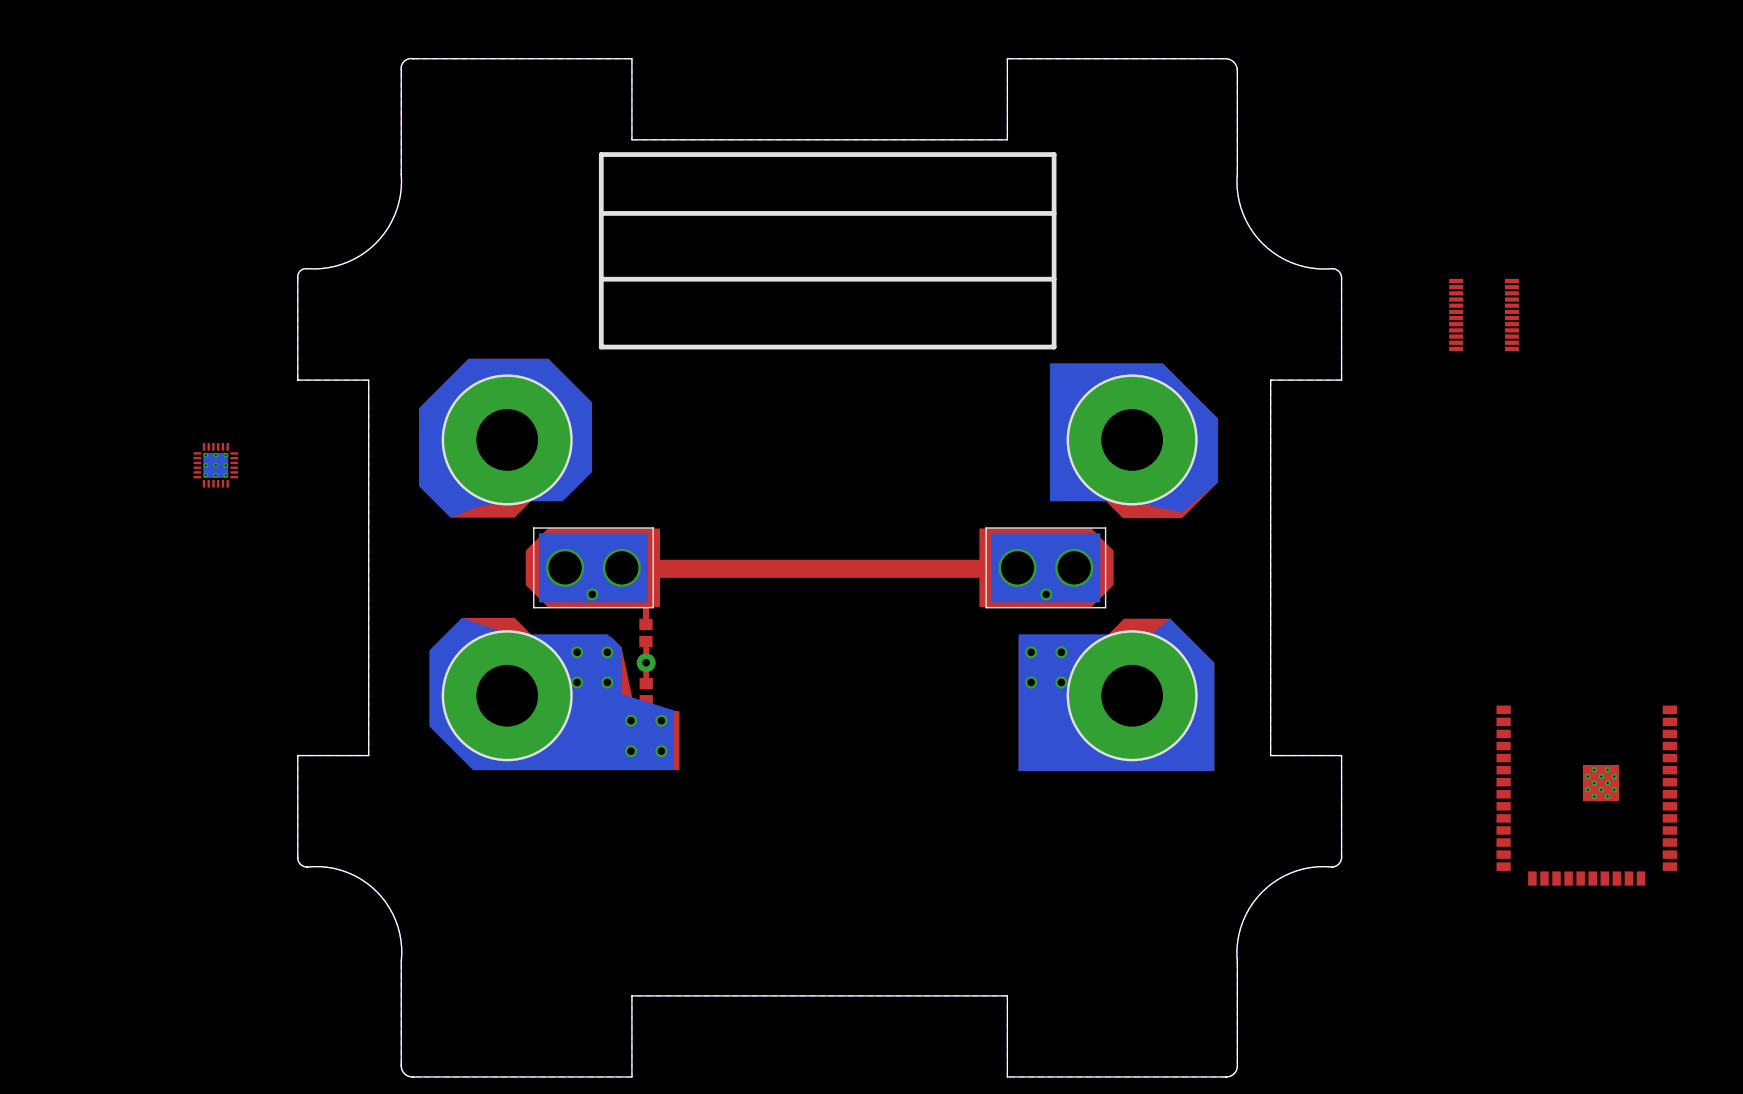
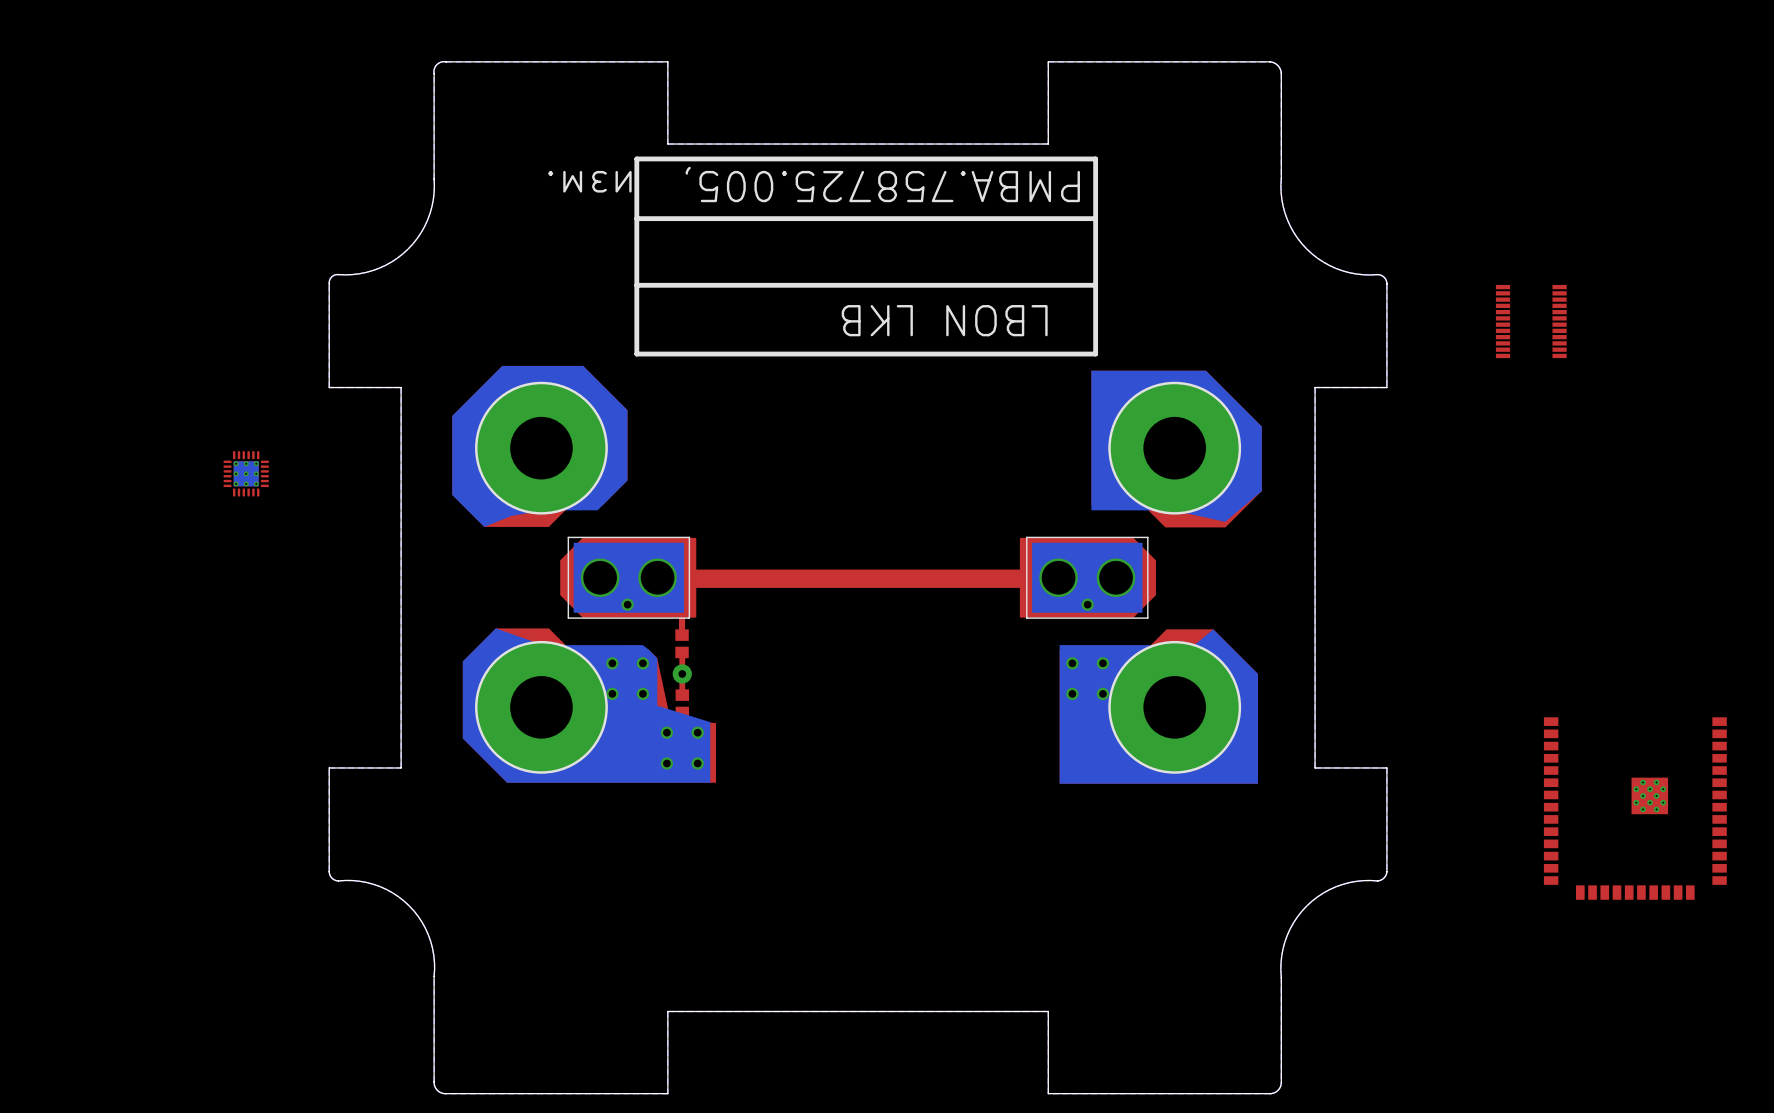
text: none -> РМВА.758725.005, изм. (814, 184)
text: none -> LBON LKB (944, 320)

